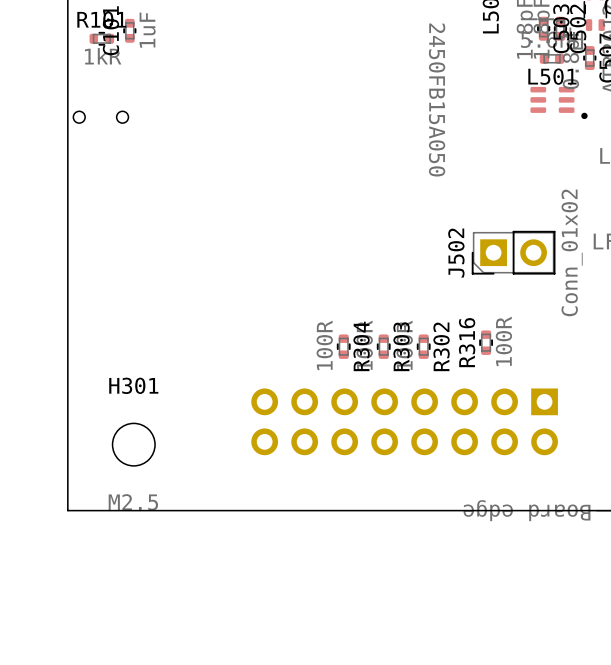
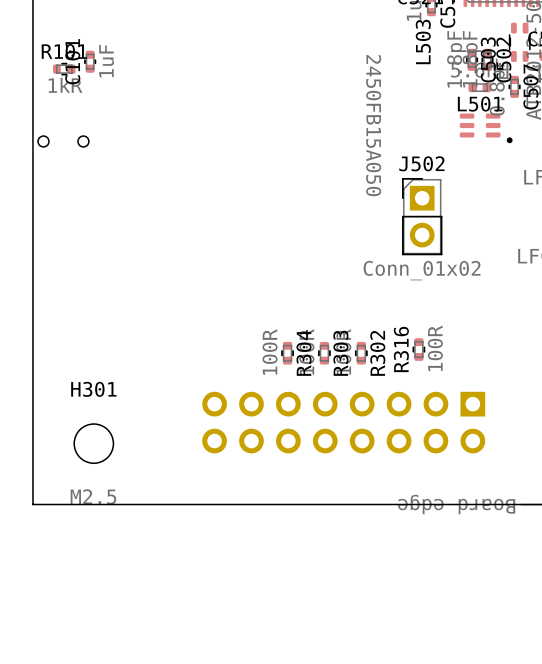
J502 rotation: 0° (513, 252) -> 90° clockwise (422, 216)
J502 position: (513, 252) -> (422, 216)

